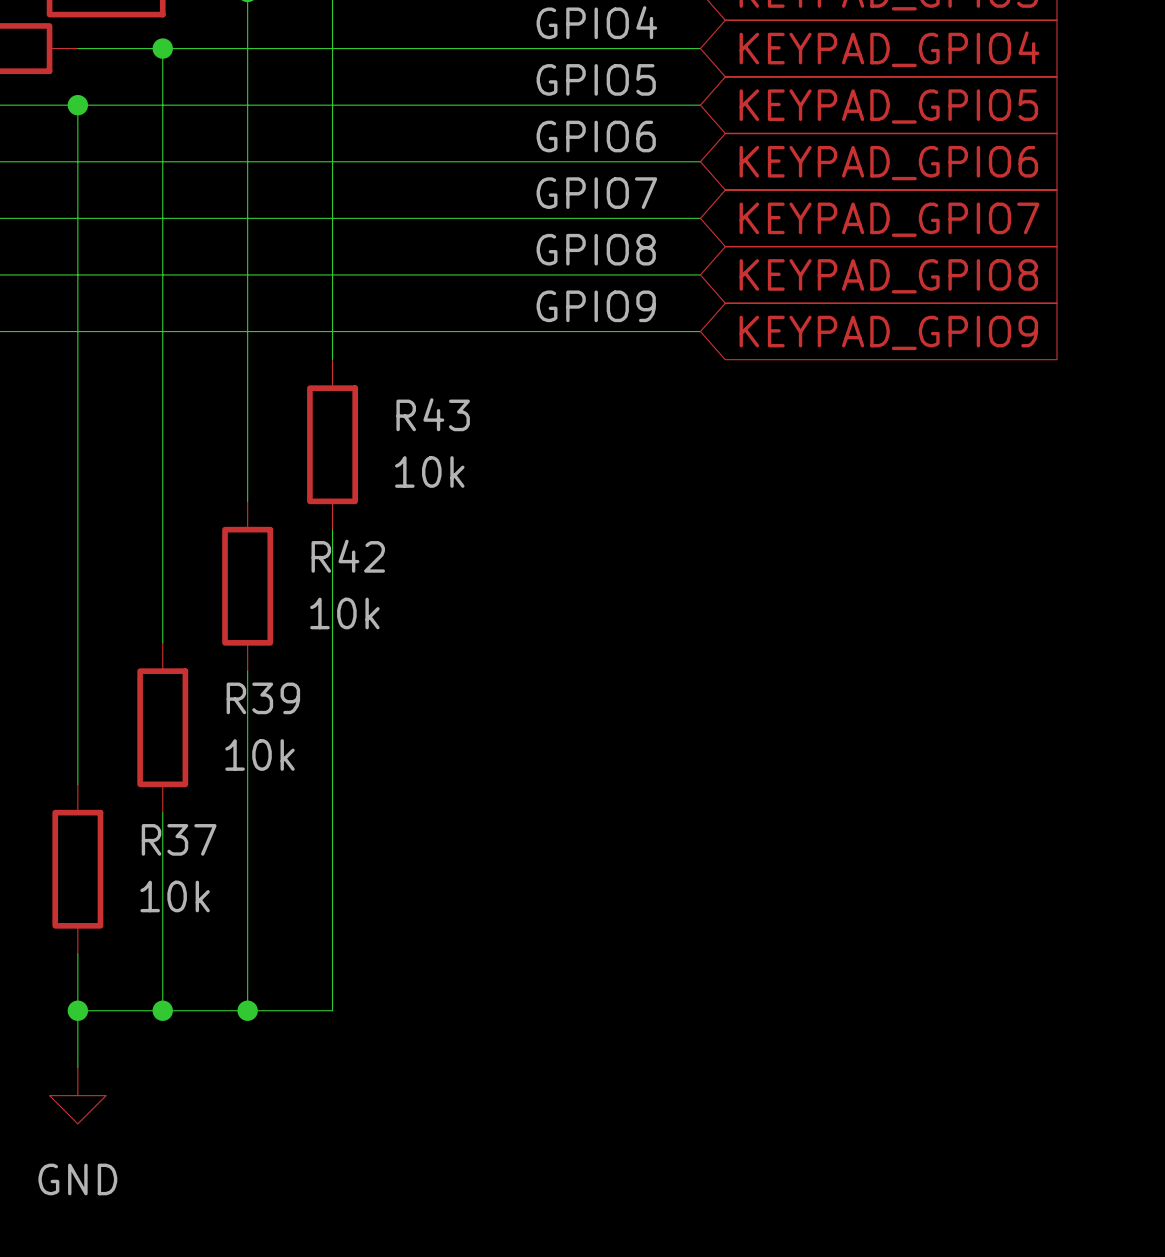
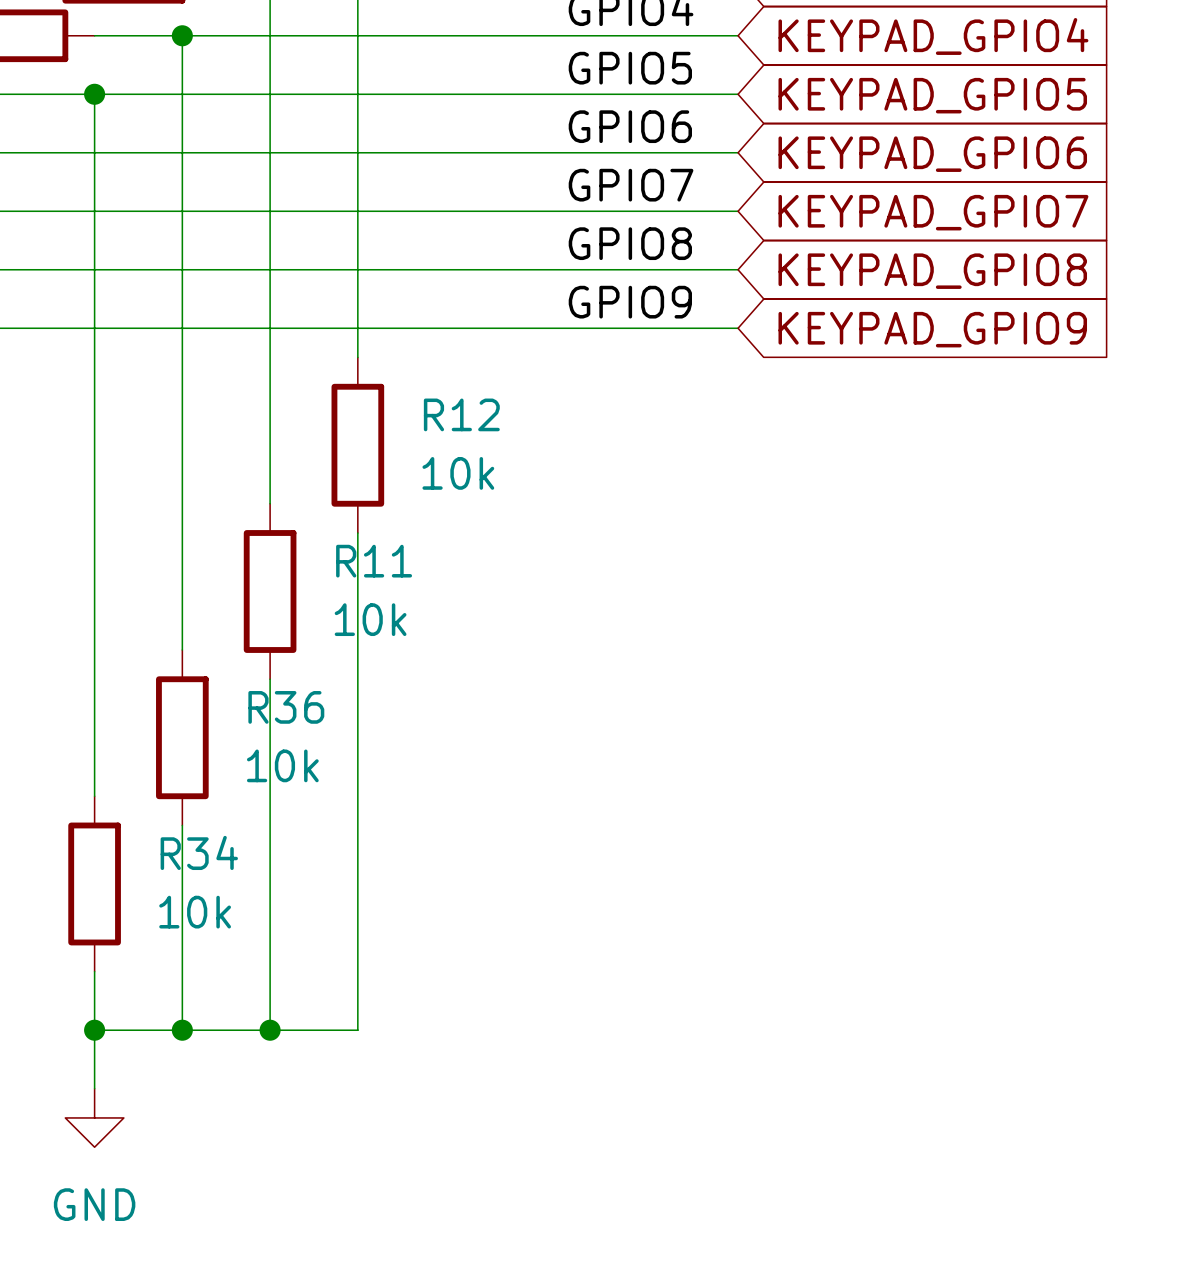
R43 name: R43 (433, 414) -> R12 (461, 414)
R42 name: R42 (348, 556) -> R11 (374, 561)
R39 name: R39 (263, 698) -> R36 (286, 707)
R37 name: R37 (179, 839) -> R34 (199, 852)

